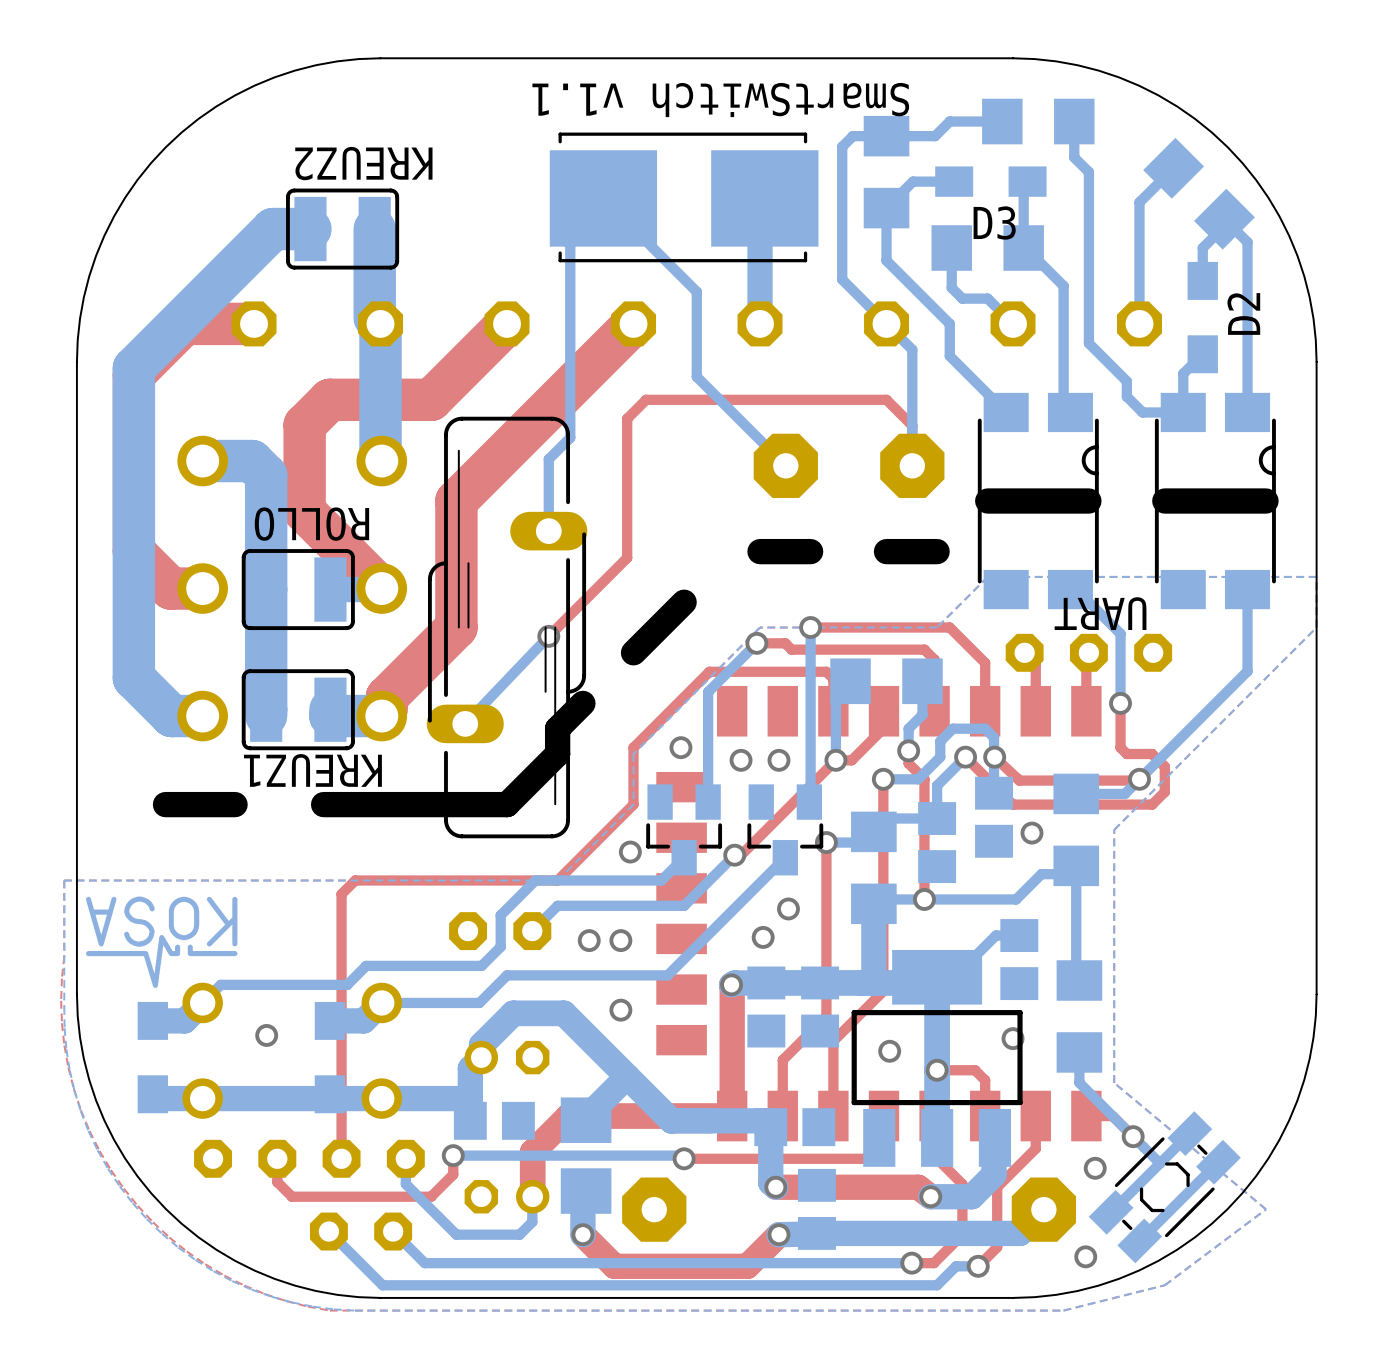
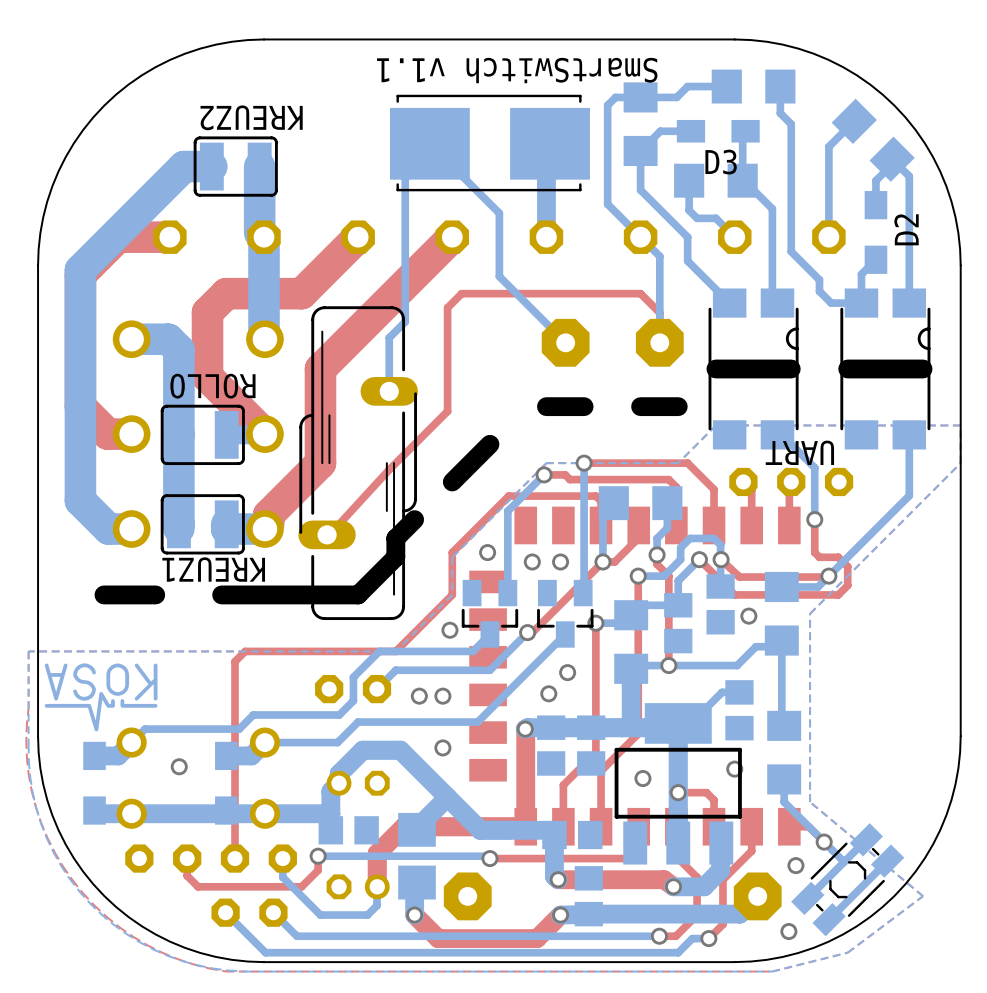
top track: none -> (389, 469) (329, 534)
bottom track: (548, 636) (465, 723) -> none
via: (548, 636) -> none

